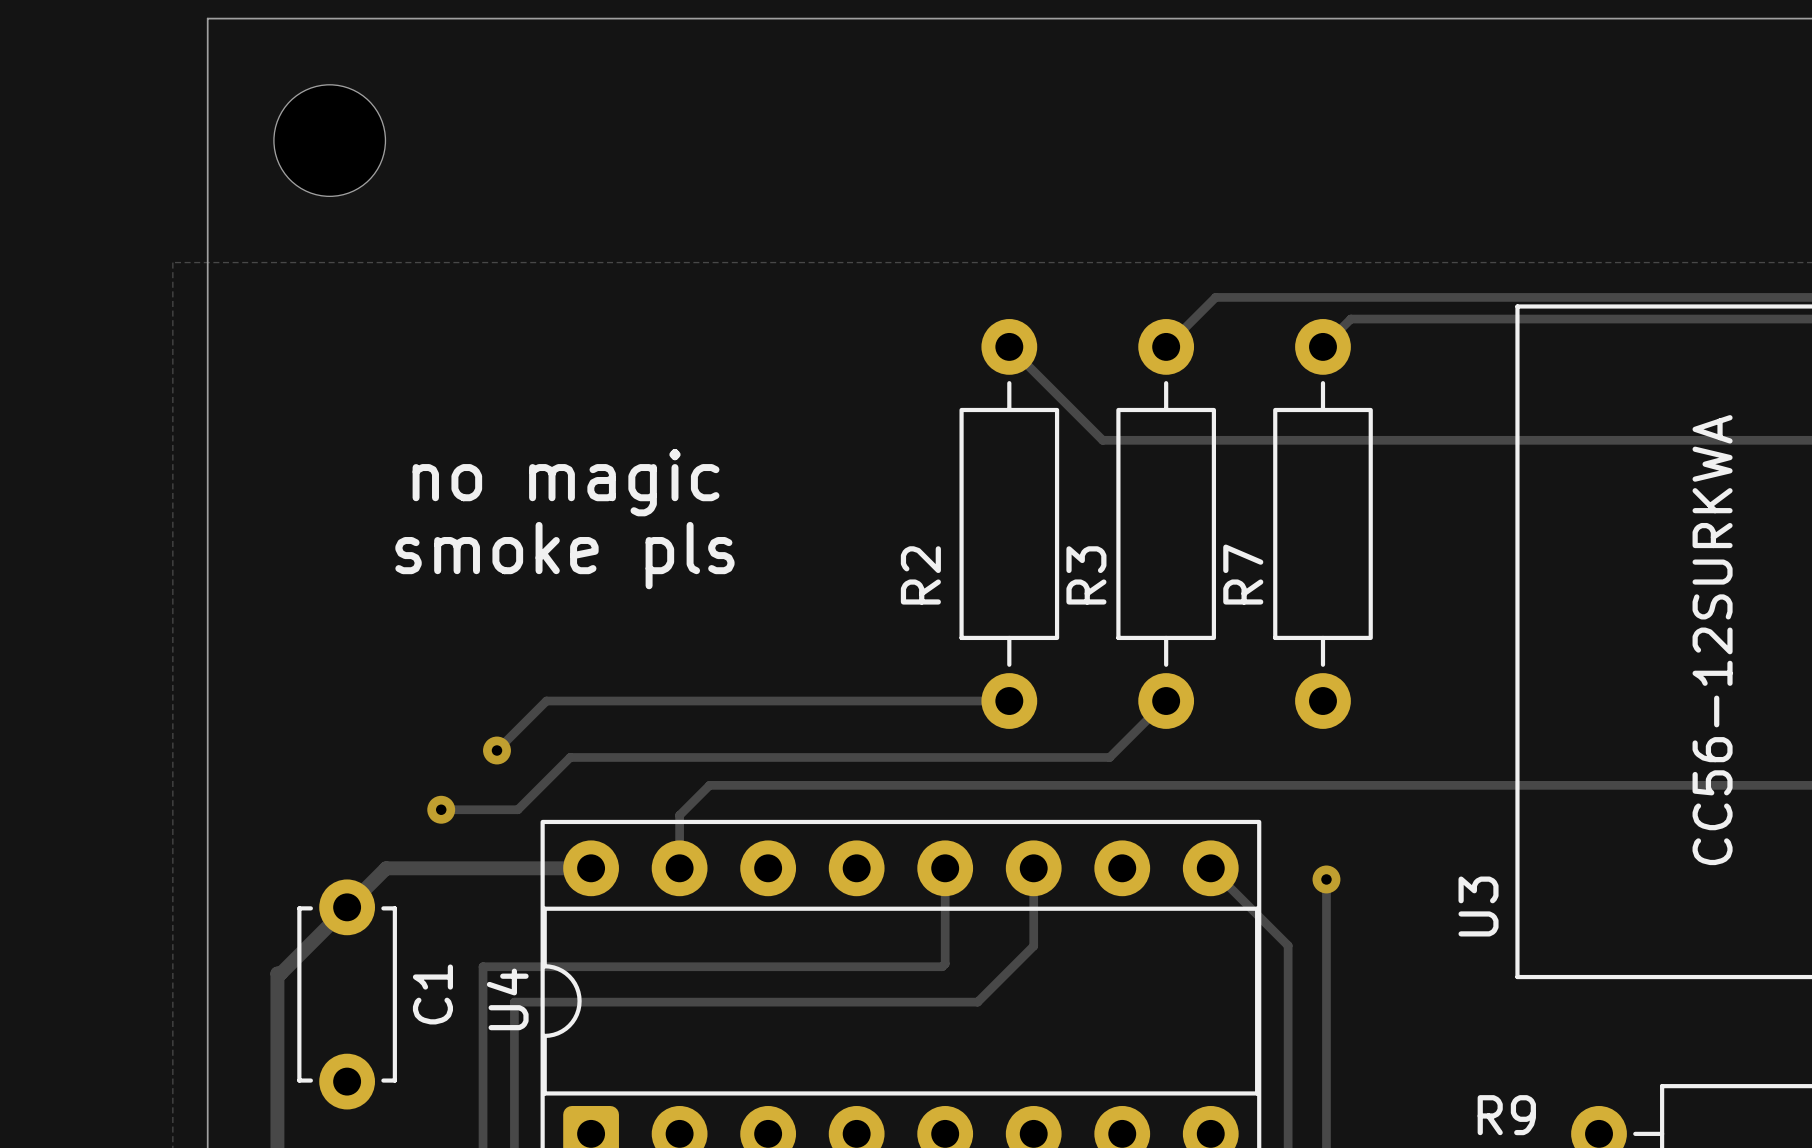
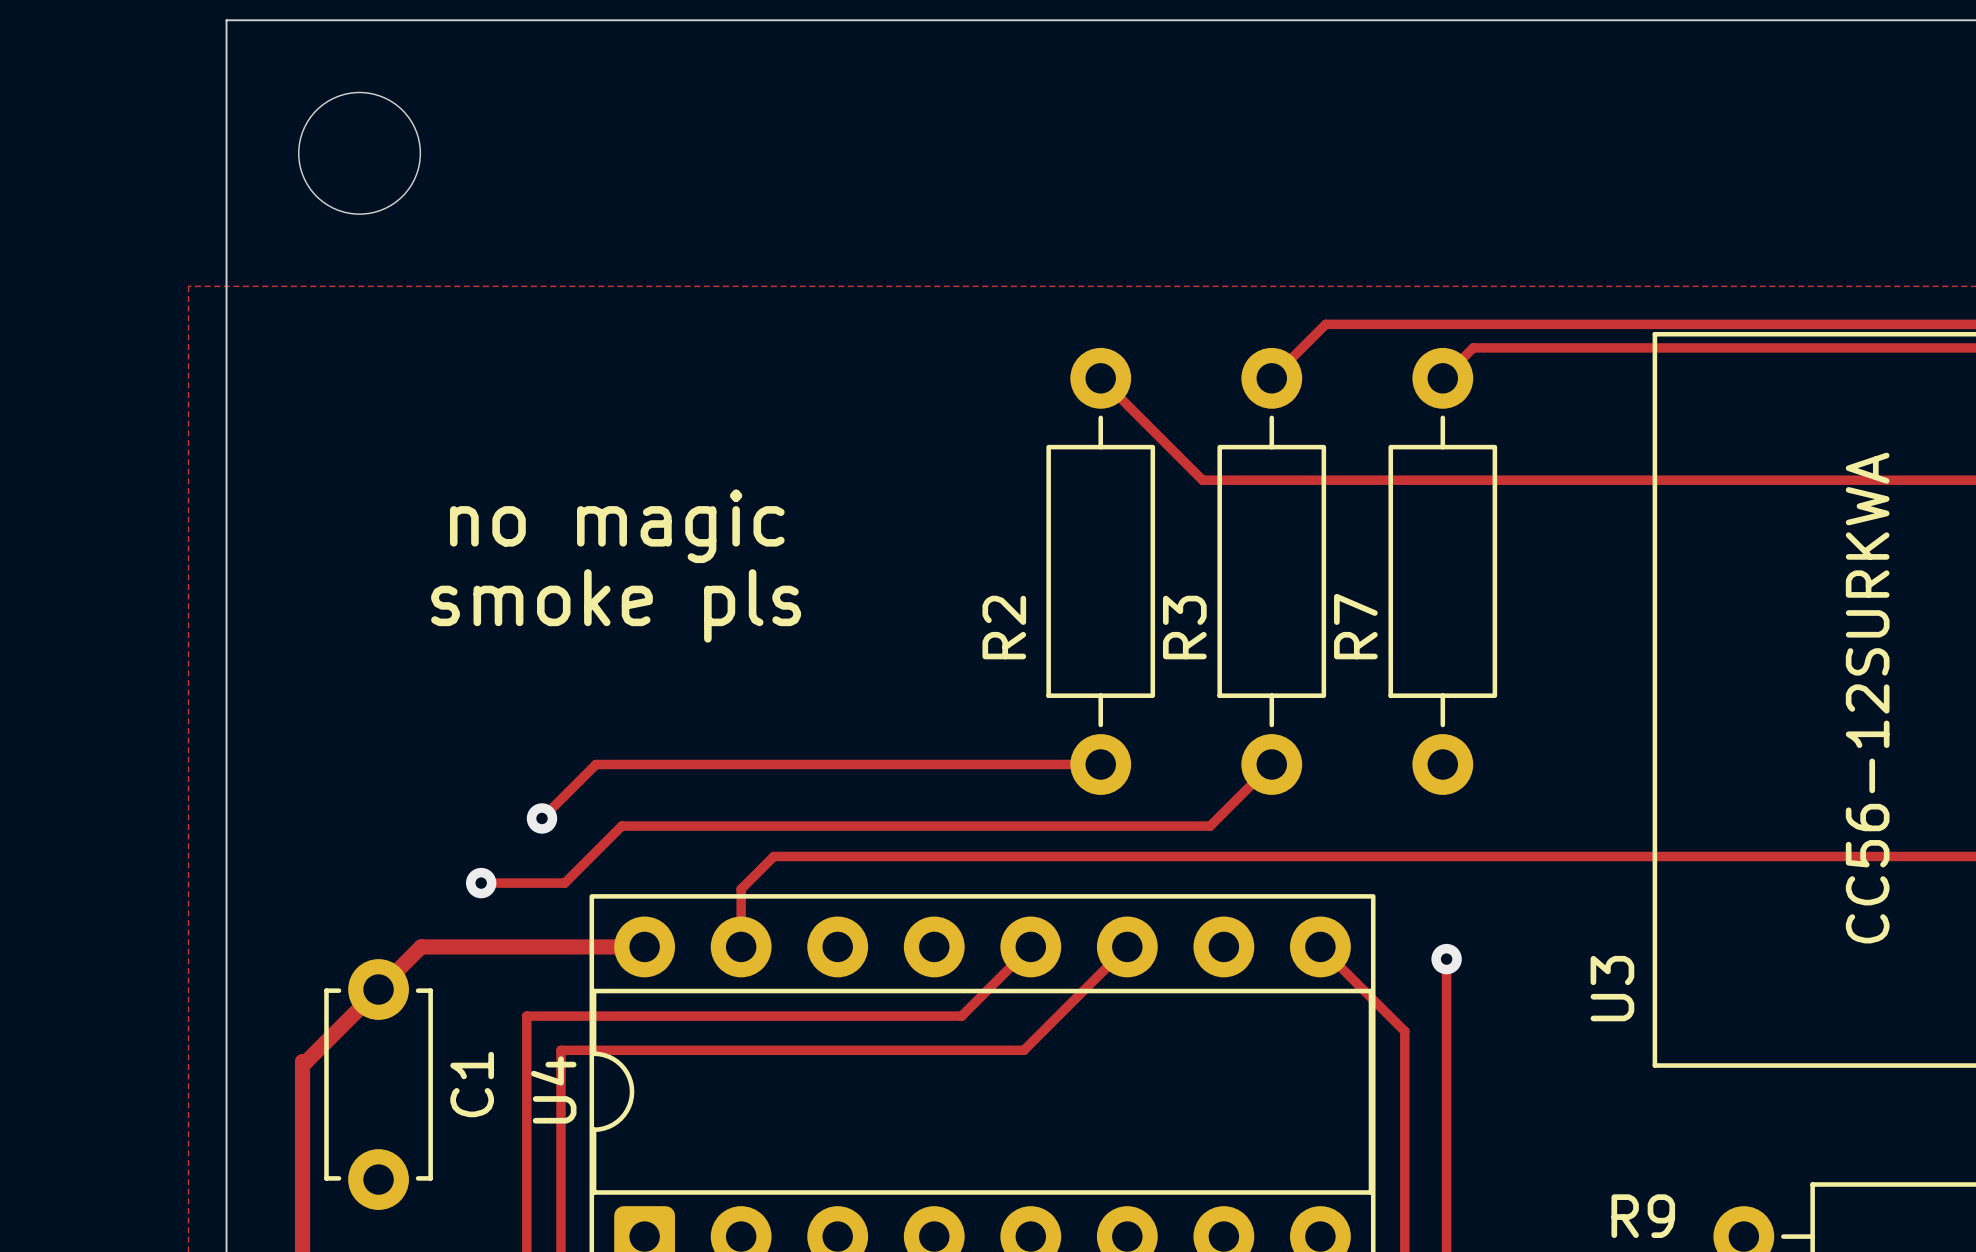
track: (945, 868) (945, 963) (942, 966) (483, 966) -> (1030, 946) (961, 1016) (526, 1016) (526, 1054)
track: (1033, 868) (1033, 946) (977, 1002) (514, 1002) -> (1127, 946) (1023, 1050) (561, 1050) (561, 1092)

